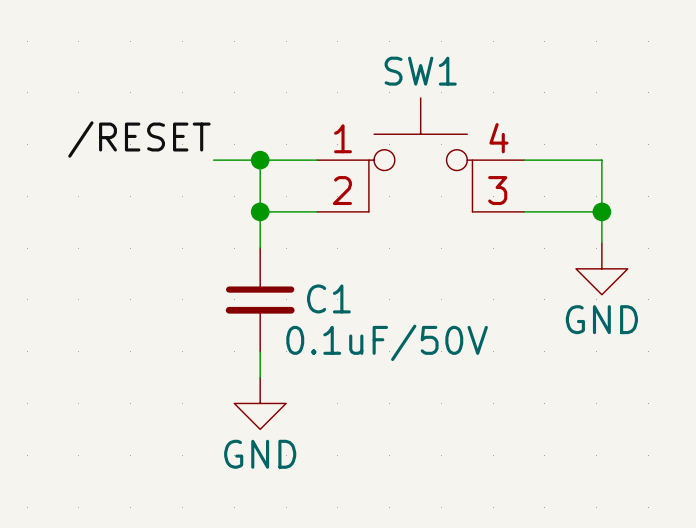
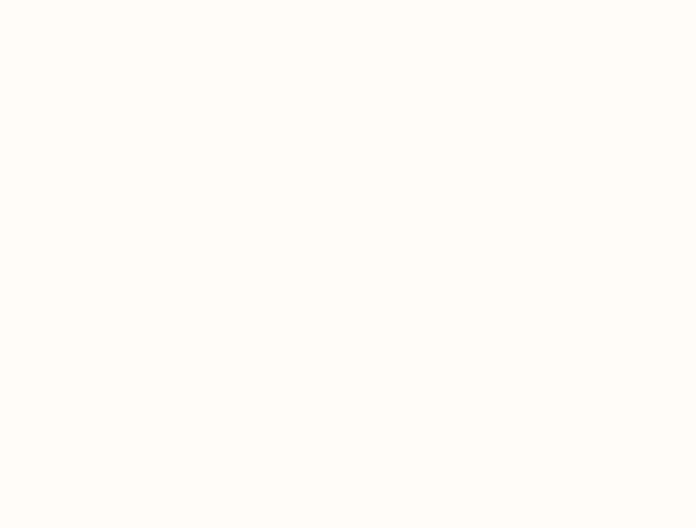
label: /RESET (139, 139) -> none
SW1: (420, 154) -> none
wire: (213, 160) (317, 160) -> none
wire: (260, 160) (260, 248) -> none
junction: (260, 160) -> none
wire: (524, 160) (601, 160) (601, 242) -> none
wire: (260, 211) (317, 211) -> none
junction: (260, 211) -> none
wire: (524, 211) (601, 211) -> none
junction: (601, 211) -> none
power symbol: GND (601, 268) -> none
C1: 0.1uF/50V (260, 299) -> none
wire: (260, 351) (260, 377) -> none
power symbol: GND (260, 403) -> none

